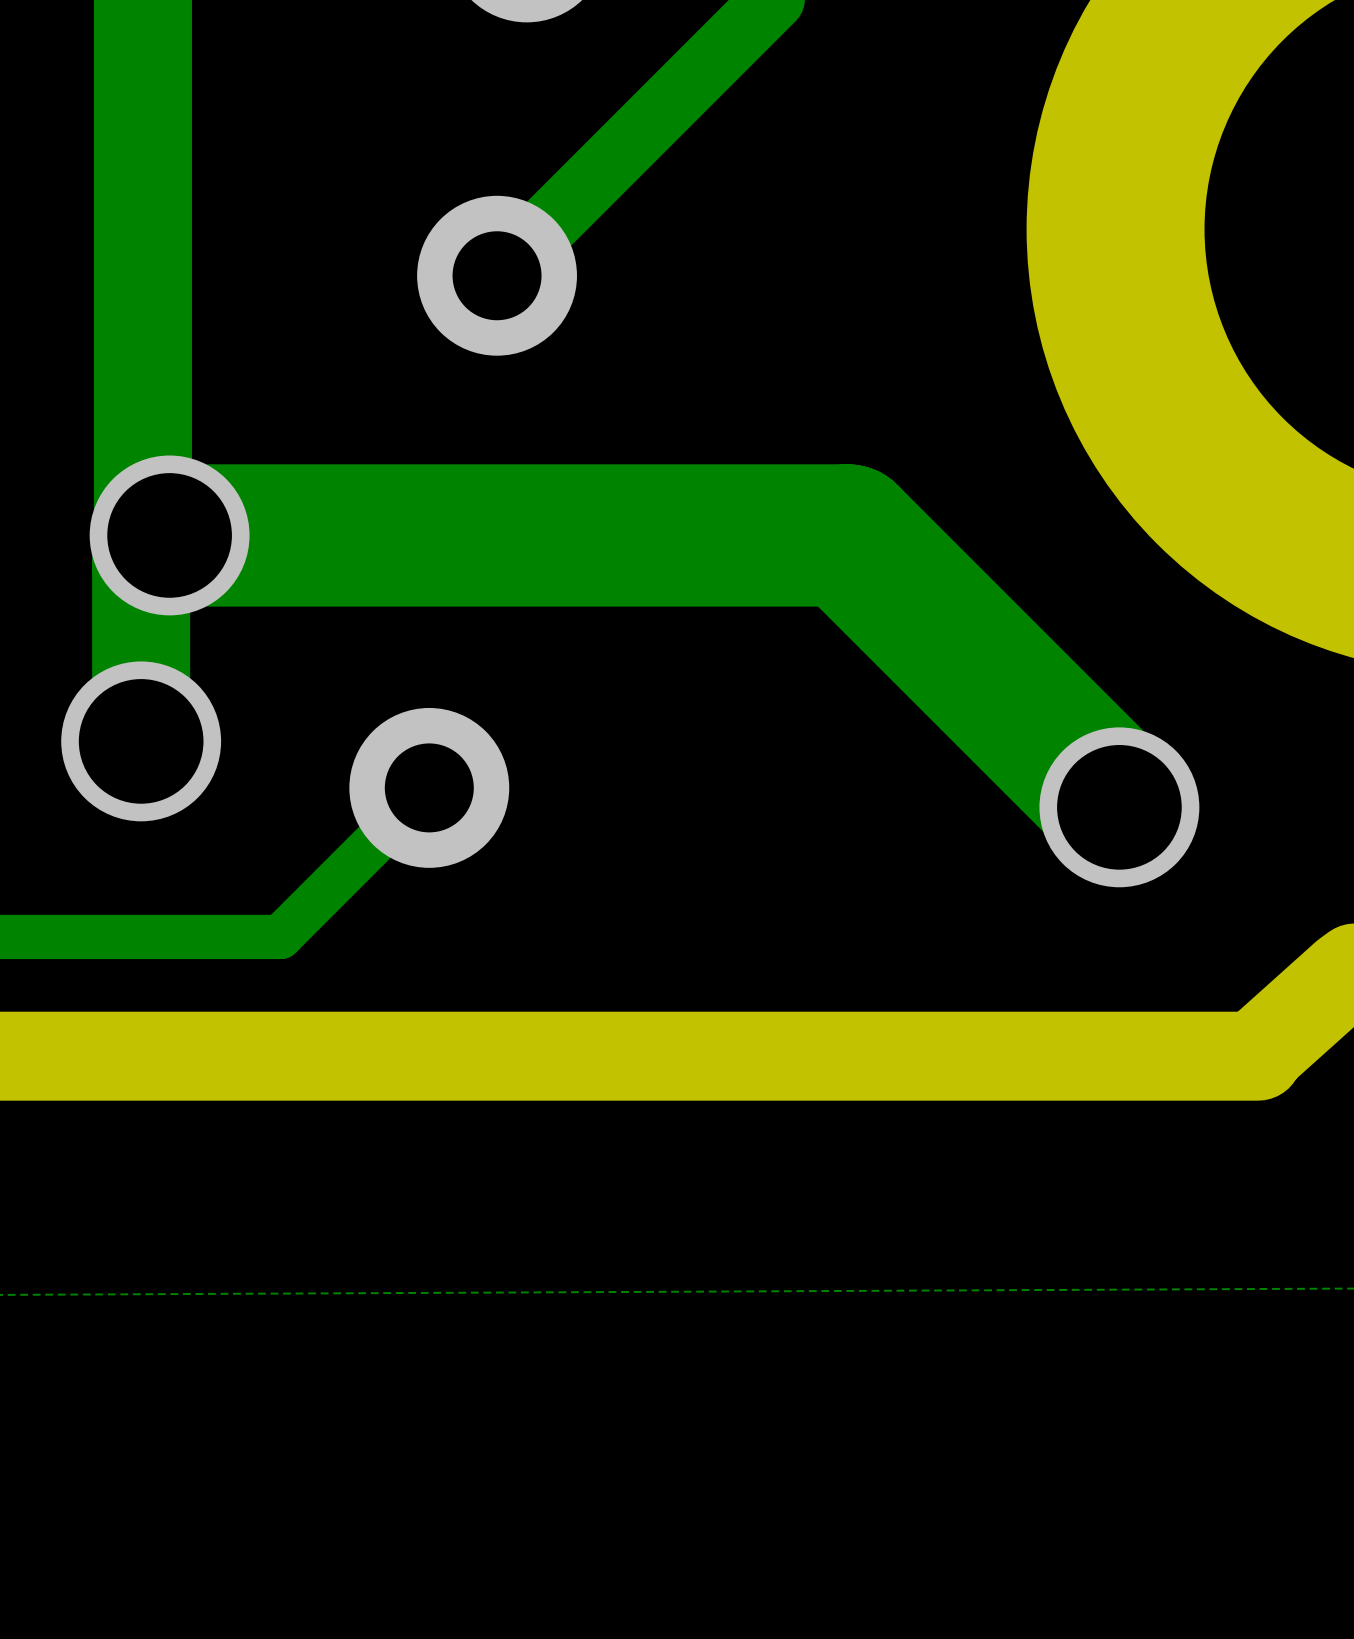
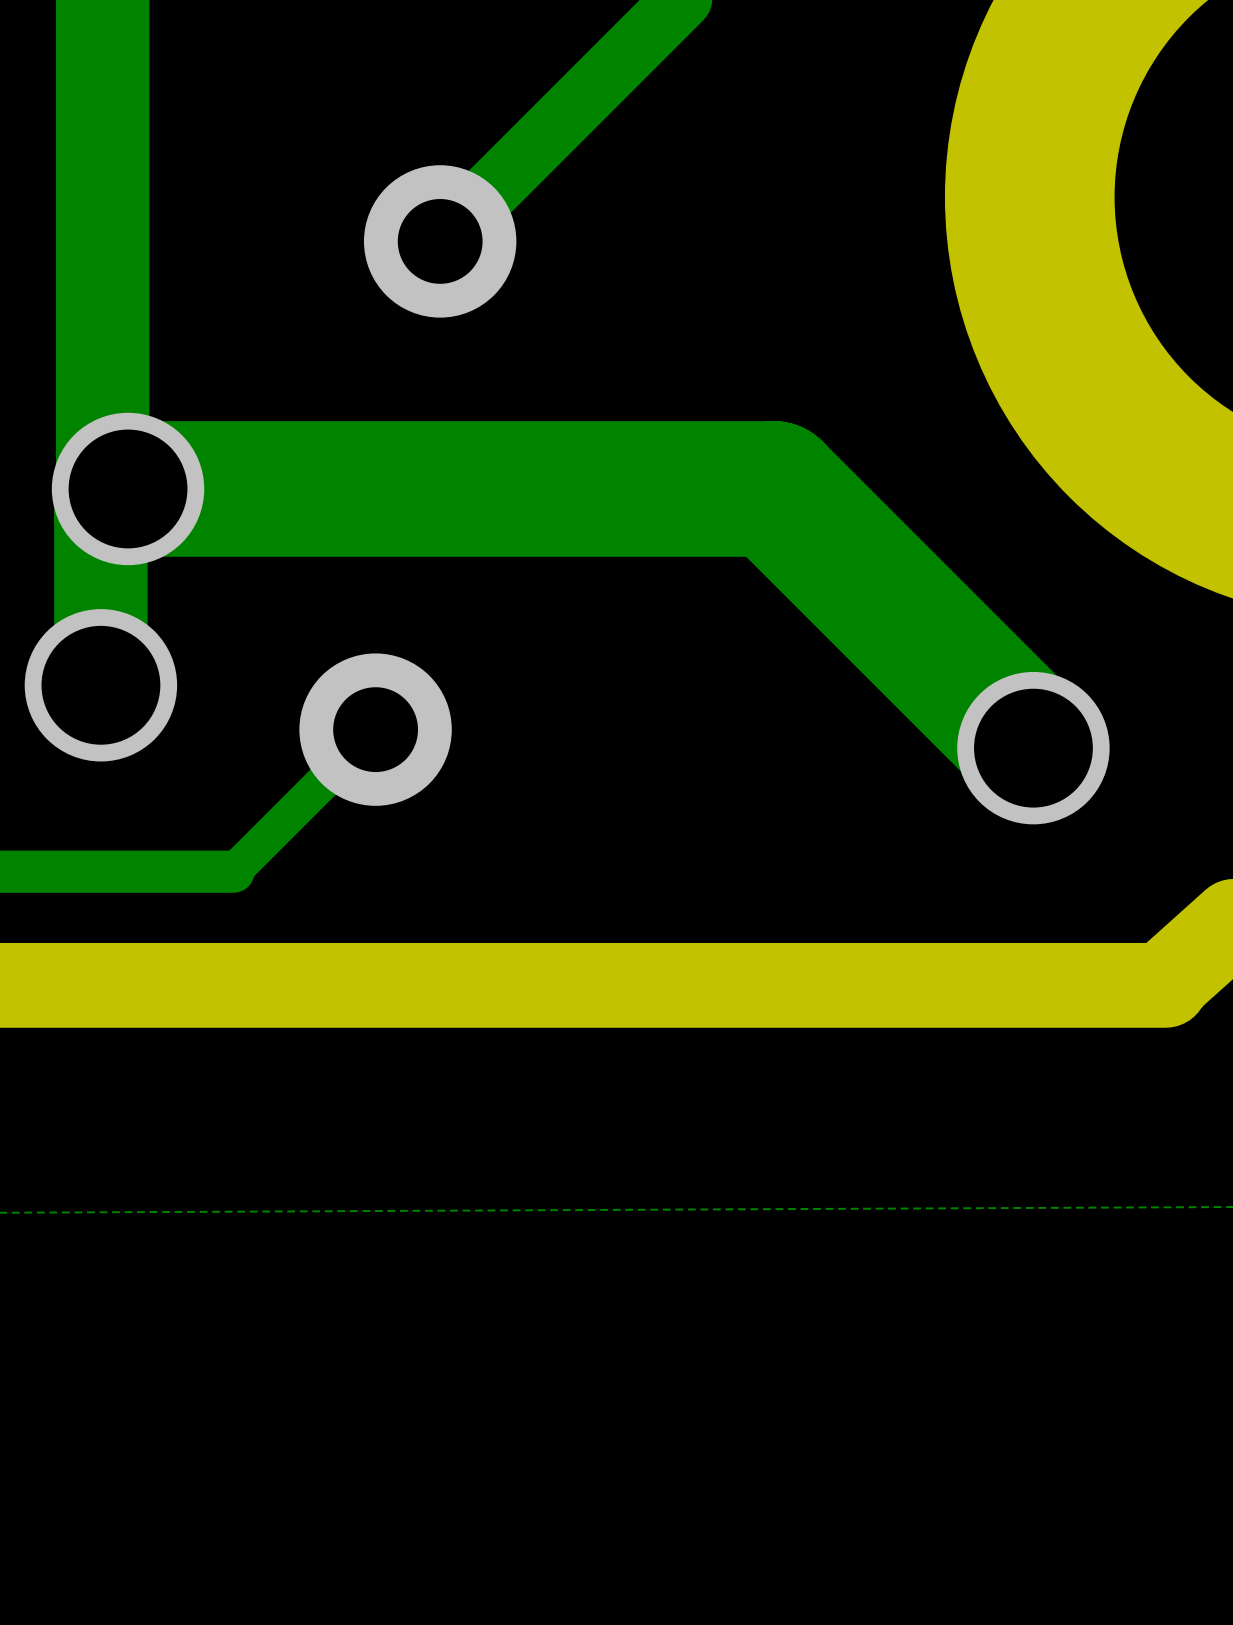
track width: thick (429, 787) (280, 936) -> thin (375, 729) (233, 871)

